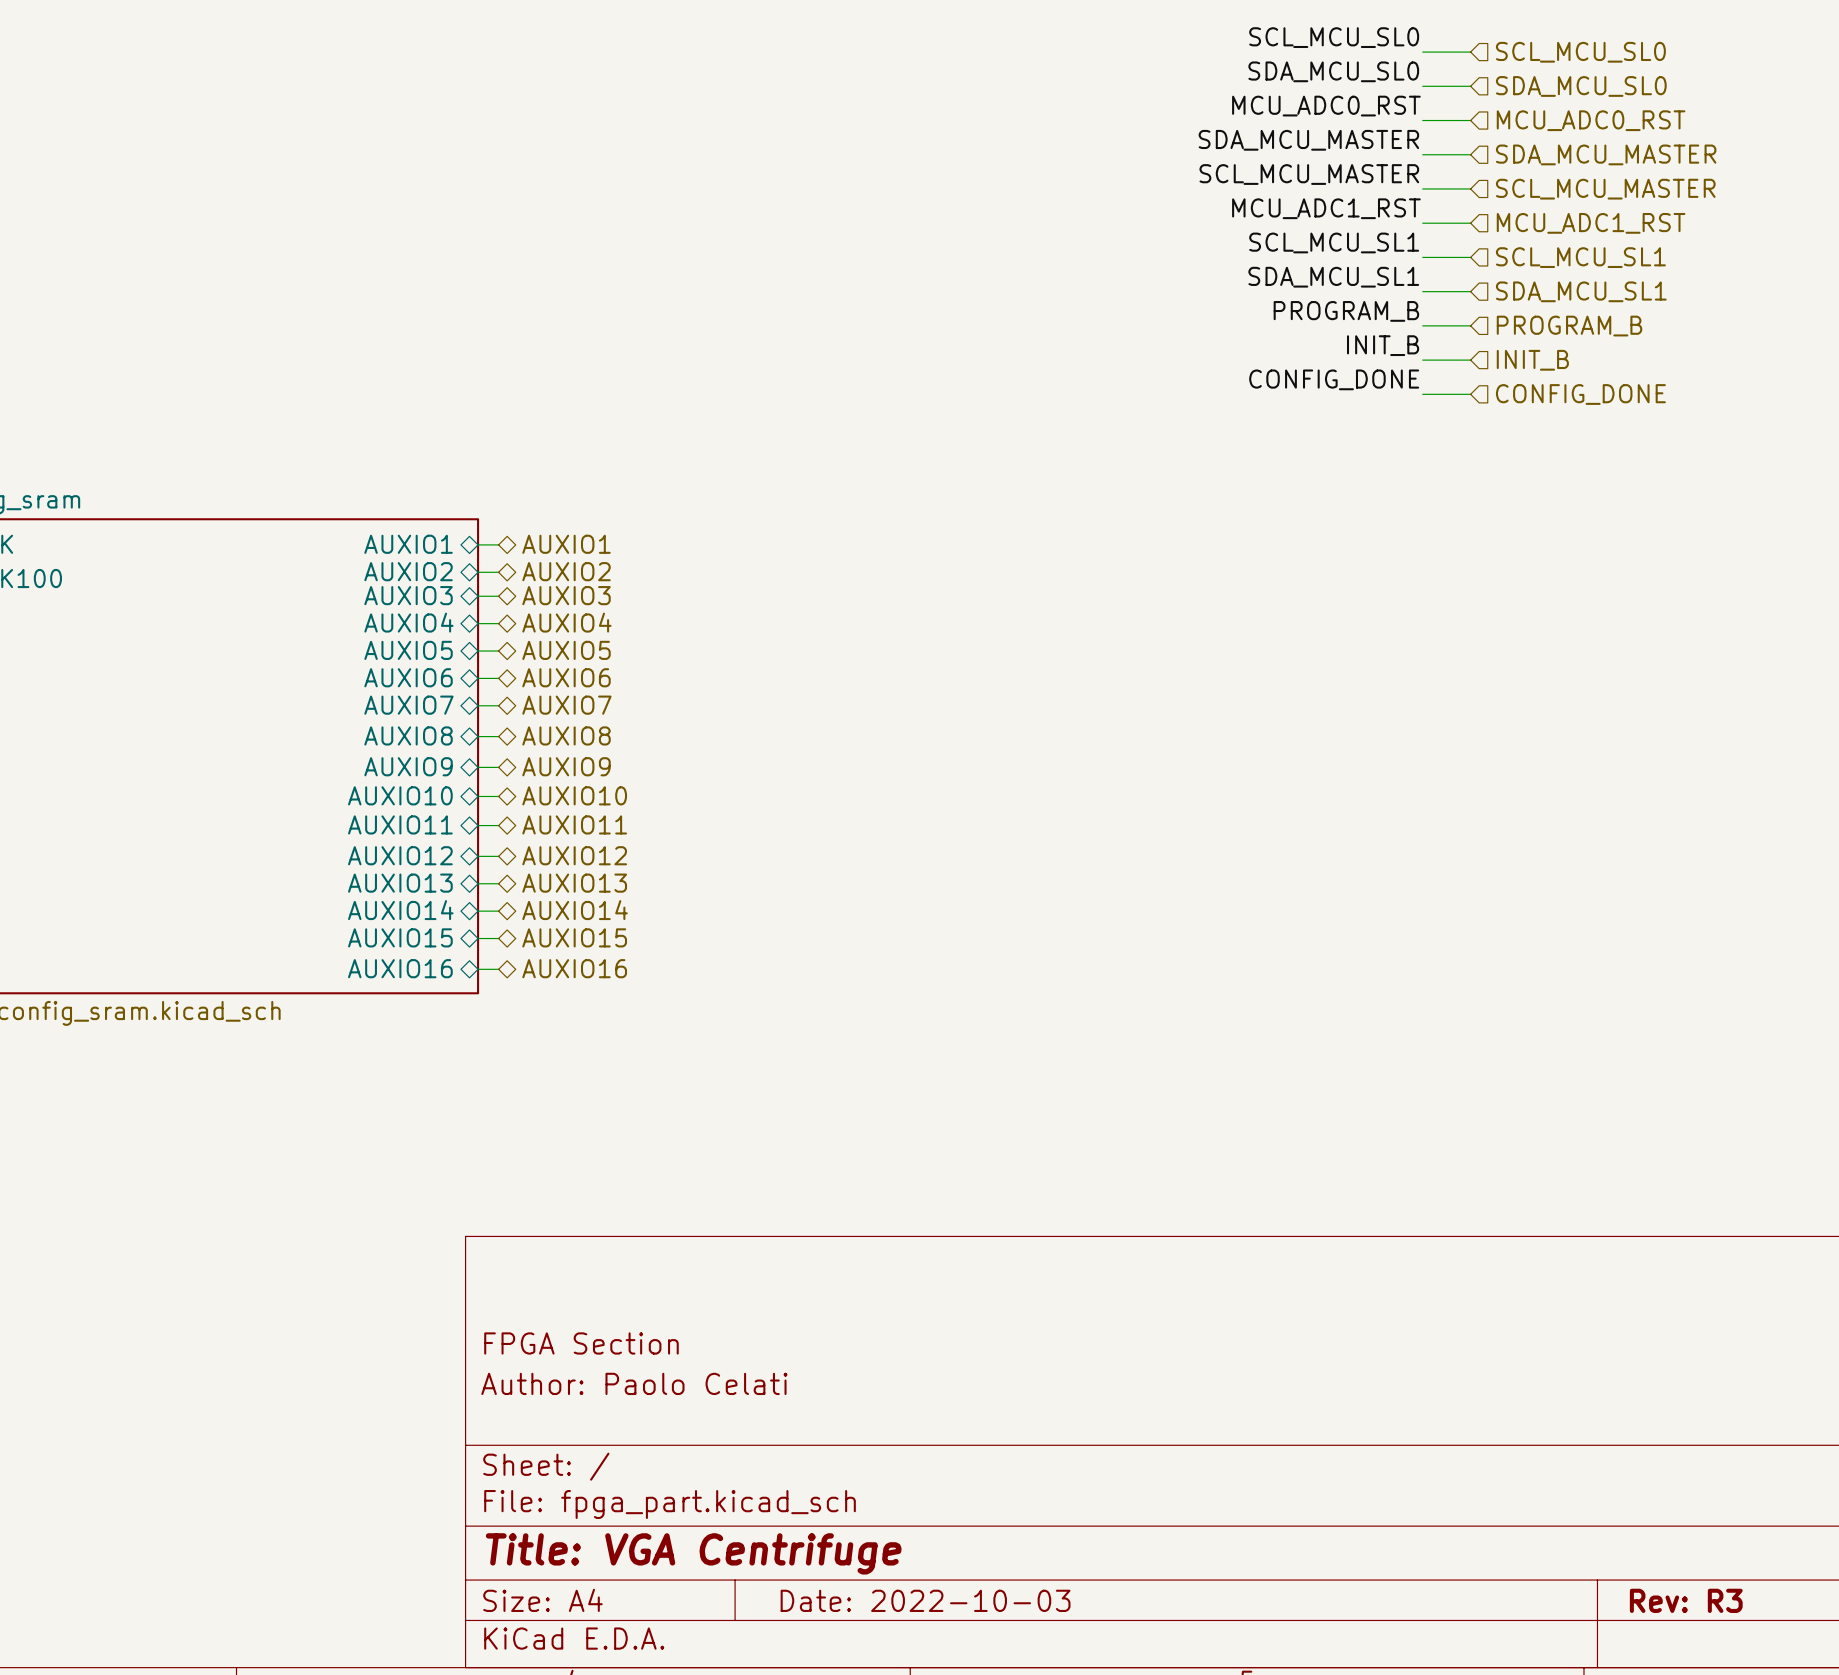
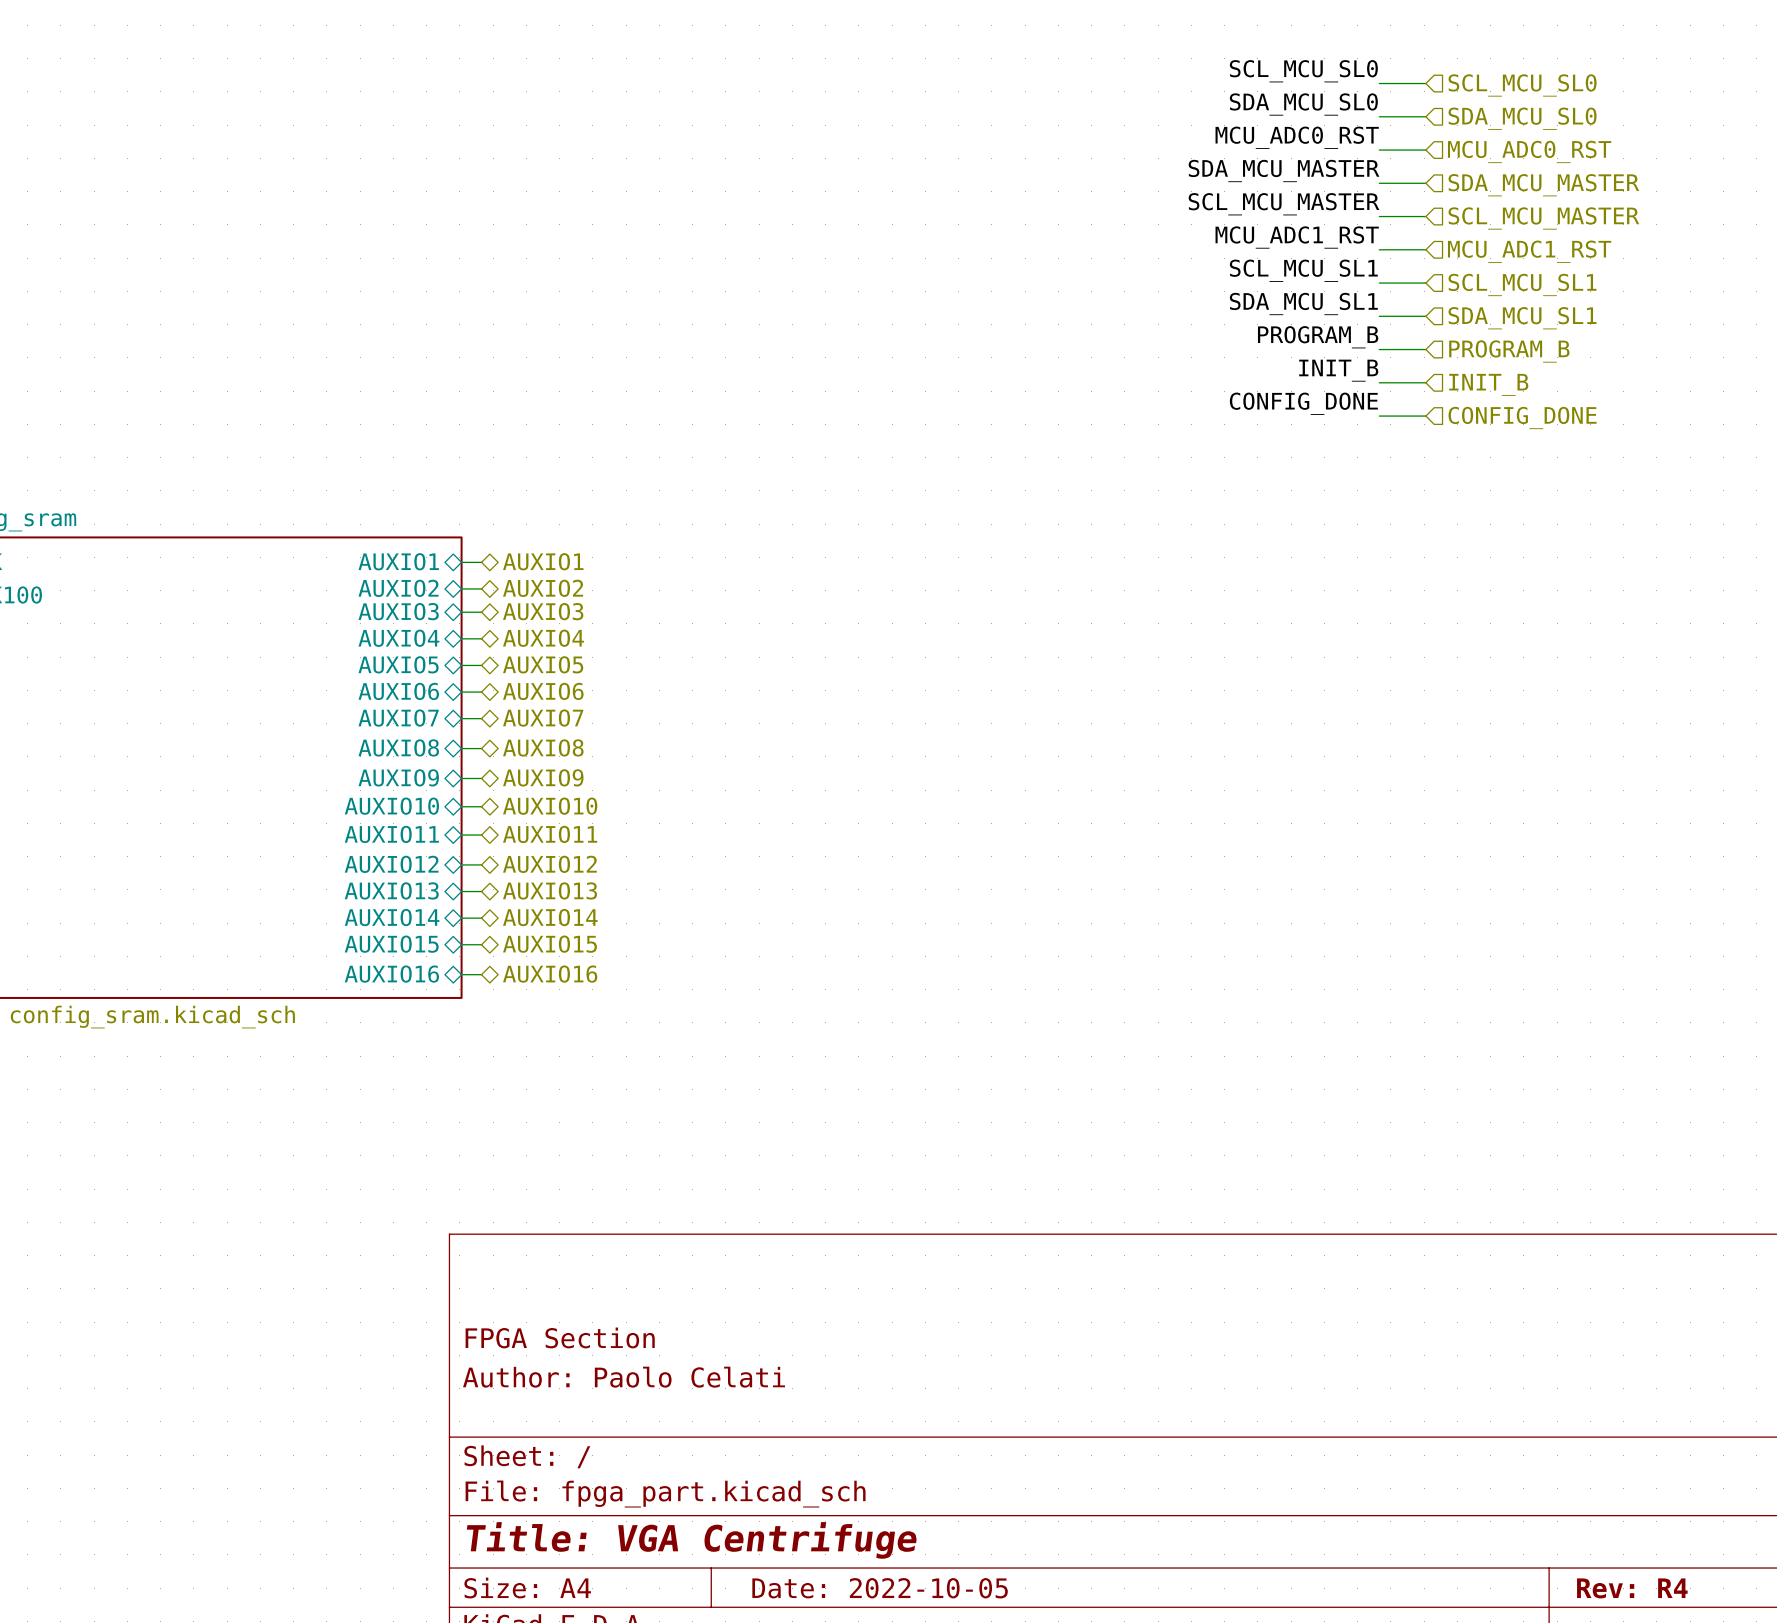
title block: Date: 2022-10-03 (925, 1600) -> Date: 2022-10-05 (880, 1588)
title block: Rev: R3 (1686, 1600) -> Rev: R4 (1632, 1588)

